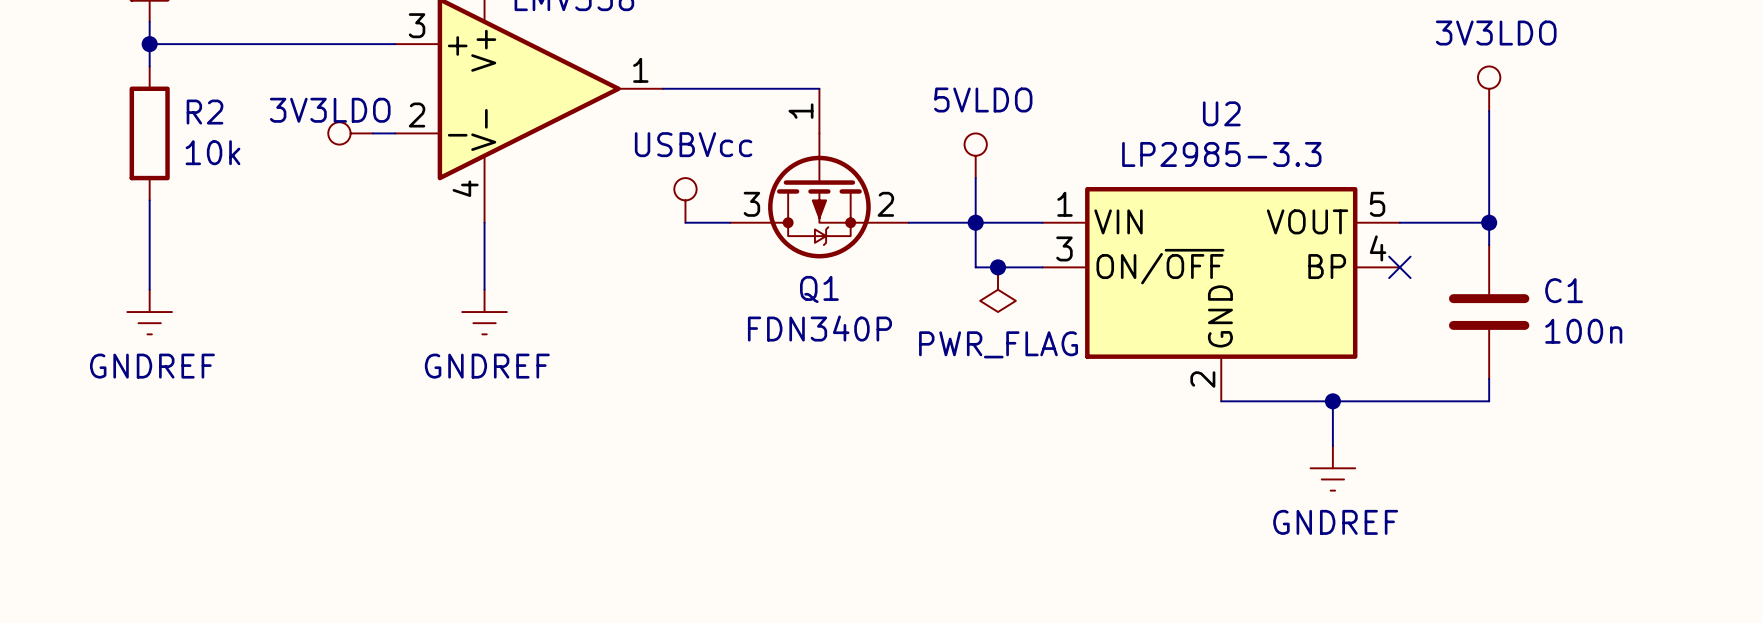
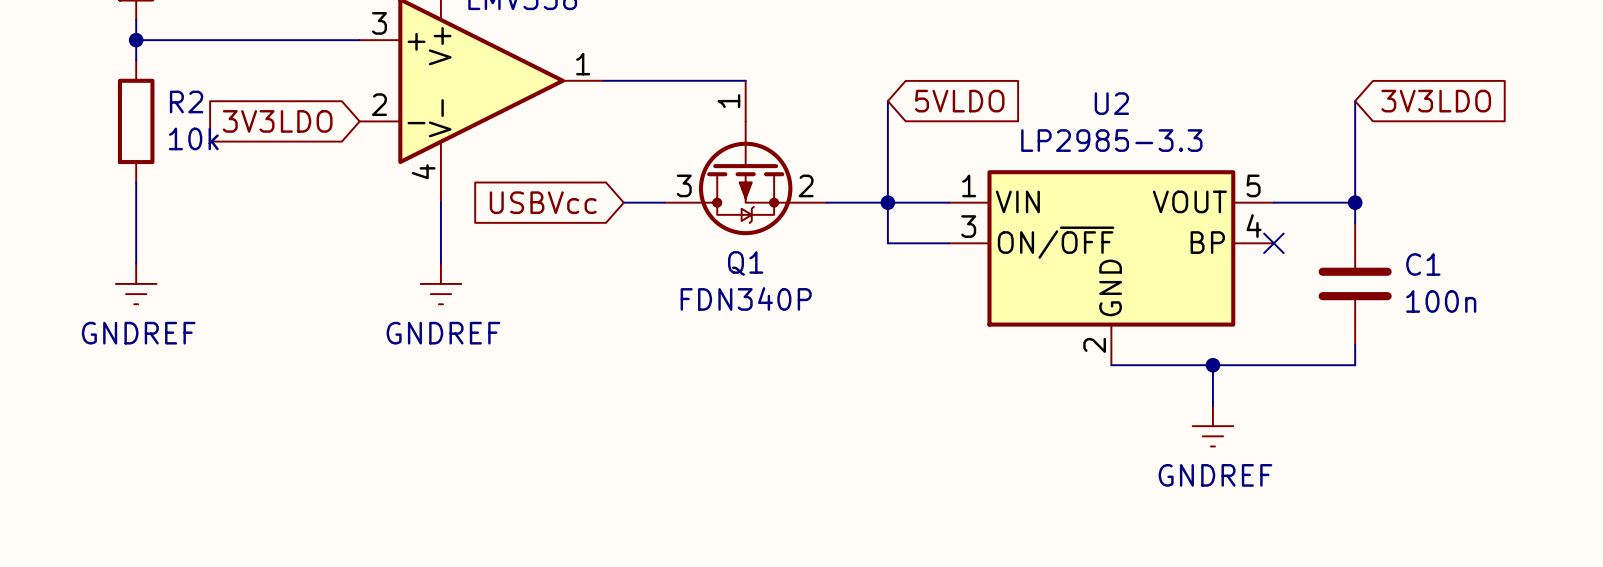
power symbol: 3V3LDO (1489, 88) -> none
wire: none -> (887, 101) (887, 162)
global label: none -> 5VLDO (959, 101)
global label: none -> 3V3LDO (1436, 101)
global label: none -> 3V3LDO (277, 121)
power symbol: 3V3LDO (350, 133) -> none
wire: (372, 133) (395, 133) -> none
power symbol: 5VLDO (975, 155) -> none
power symbol: USBVcc (685, 200) -> none
global label: none -> USBVcc (543, 202)
junction: (998, 267) -> none
power symbol: PWR_FLAG (998, 289) -> none

